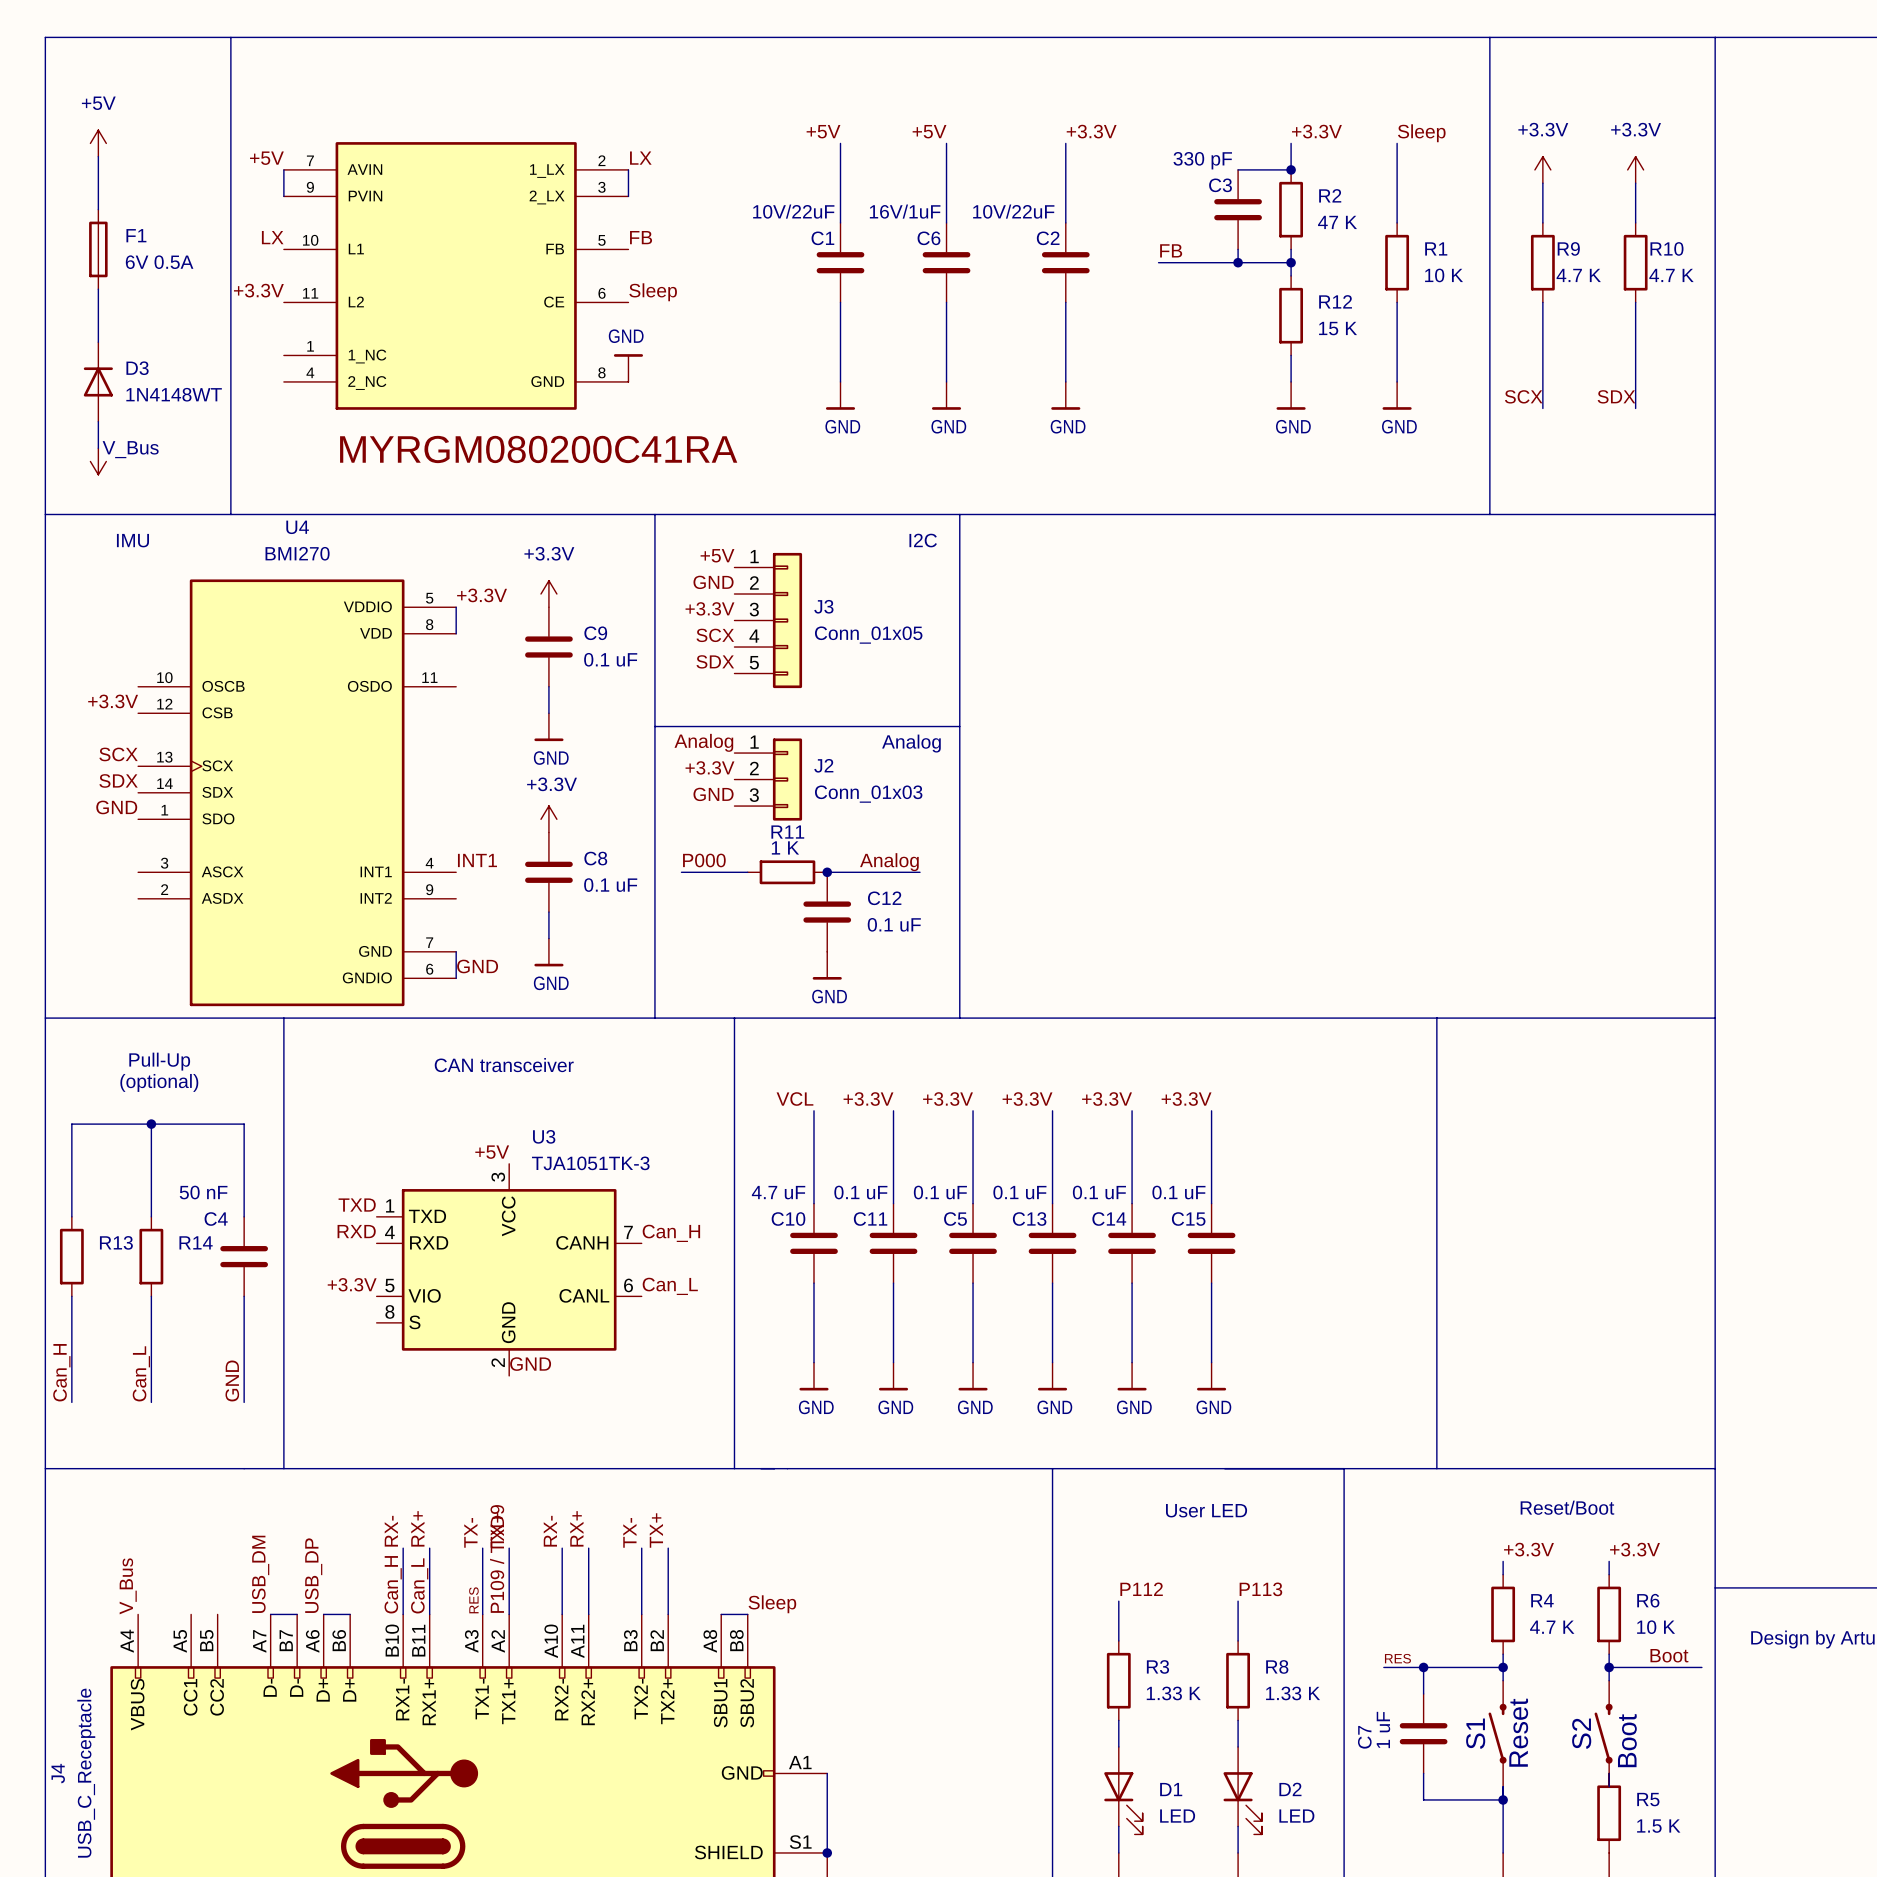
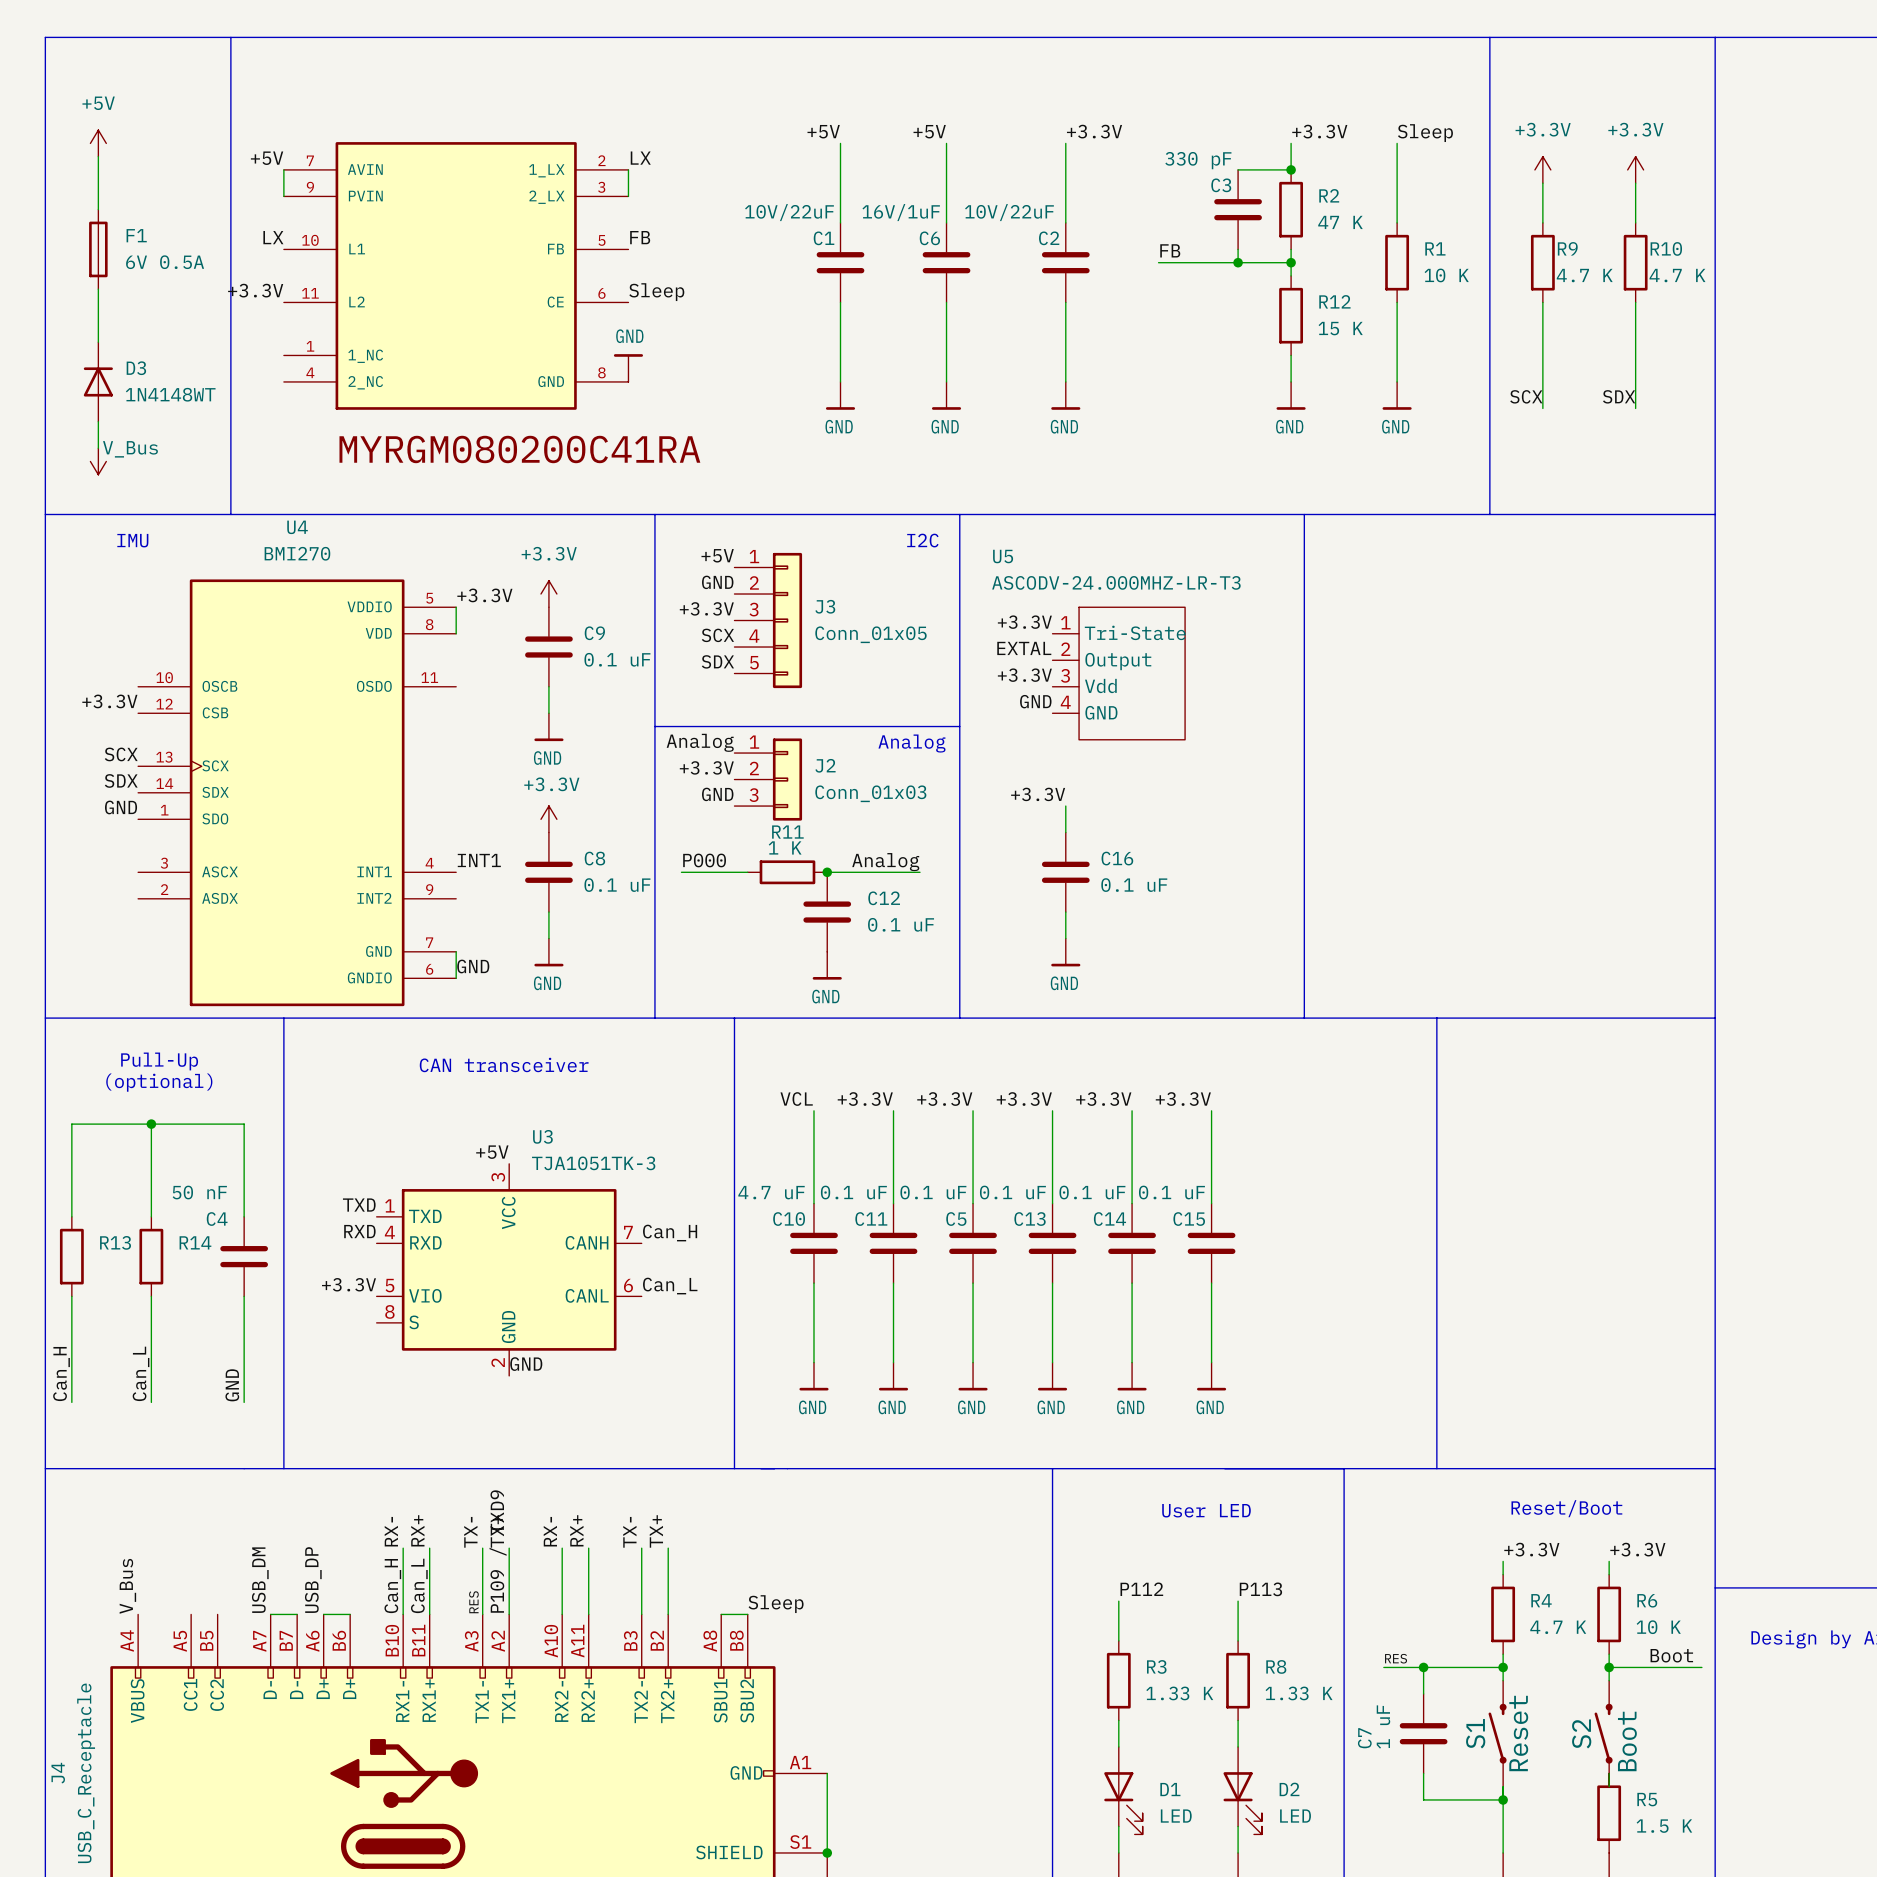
line: none -> (1304, 514) (1304, 1018)
label: none -> +3.3V (1024, 622)
label: none -> EXTAL (1024, 648)
U5: none -> ASCODV-24.000MHZ-LR-T3 (1118, 673)
label: none -> +3.3V (1024, 675)
label: none -> GND (1035, 701)
label: none -> +3.3V (1038, 794)
wire: none -> (1065, 806) (1065, 832)
C16: none -> 0.1 uF (1065, 872)
wire: none -> (1065, 912) (1065, 938)
power symbol: none -> GND (1065, 952)

